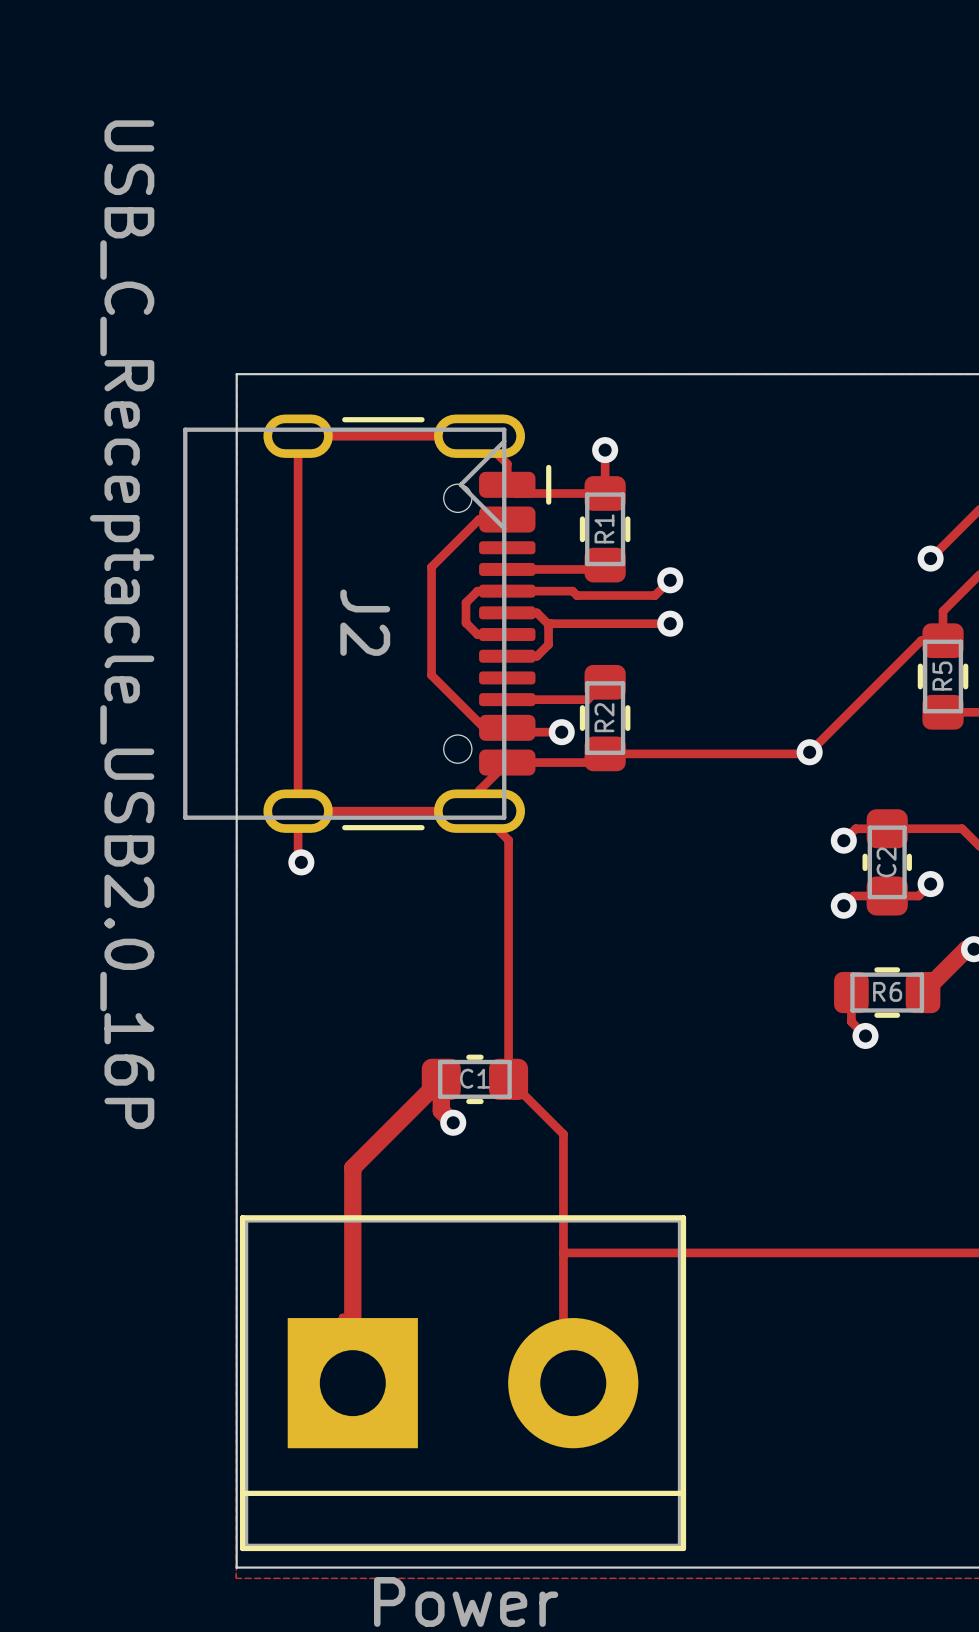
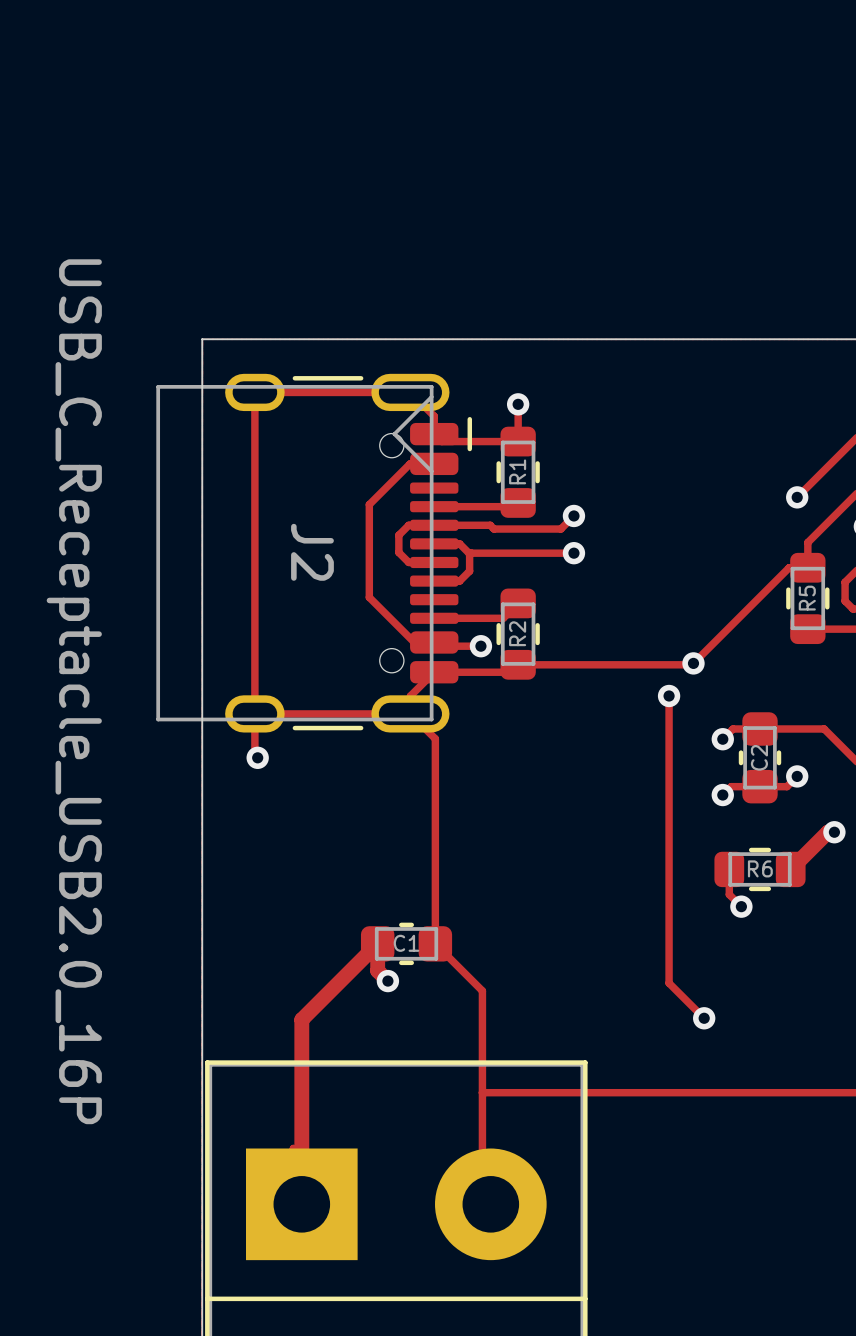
J2 value position: USB_C_Receptacle_USB2.0_16P (122, 624) -> USB_C_Receptacle_USB2.0_16P (74, 691)
track: none -> (669, 696) (669, 983) (704, 1018)
via: none -> (669, 696)
via: none -> (704, 1018)

